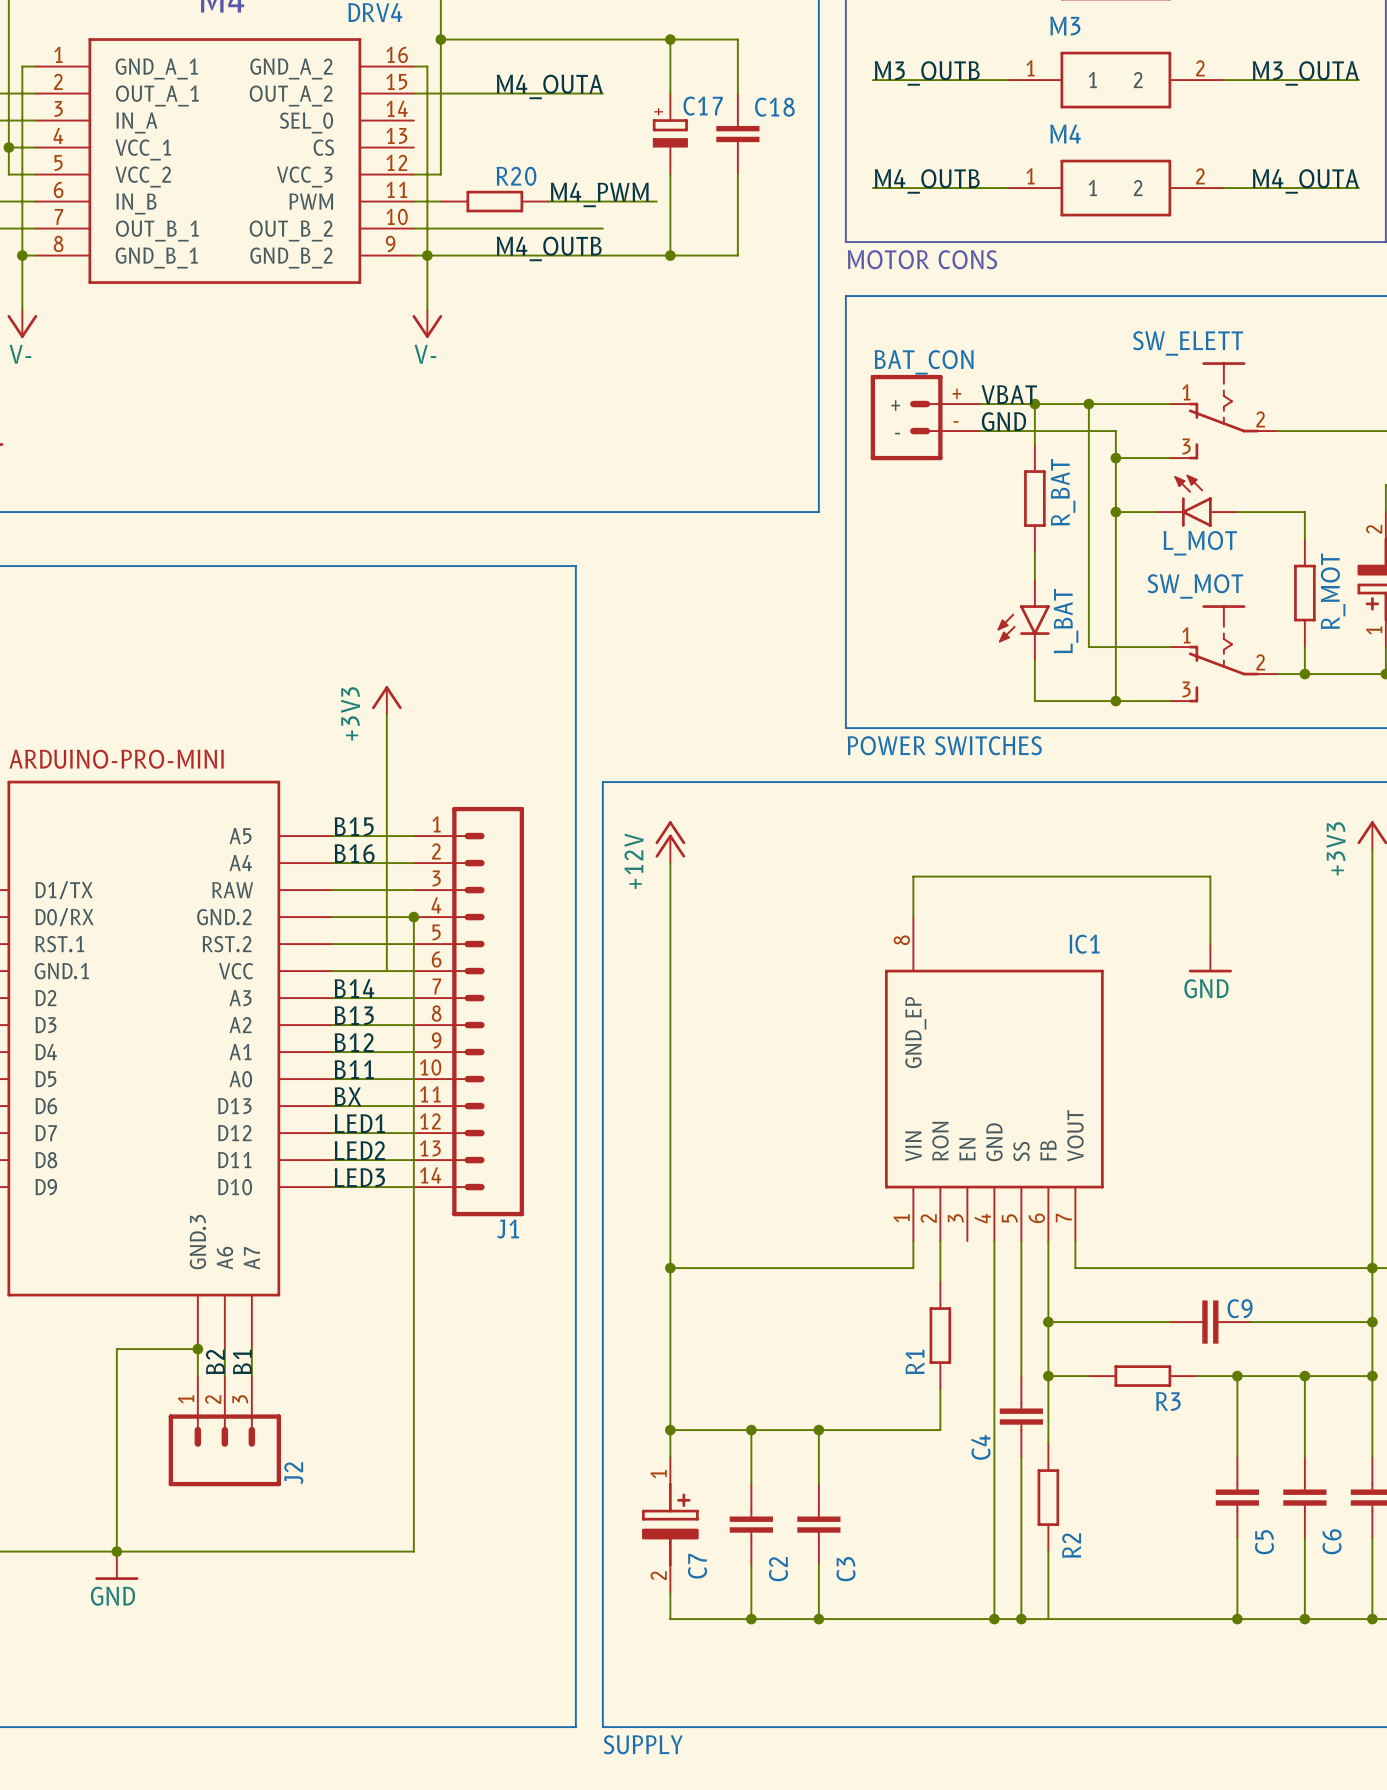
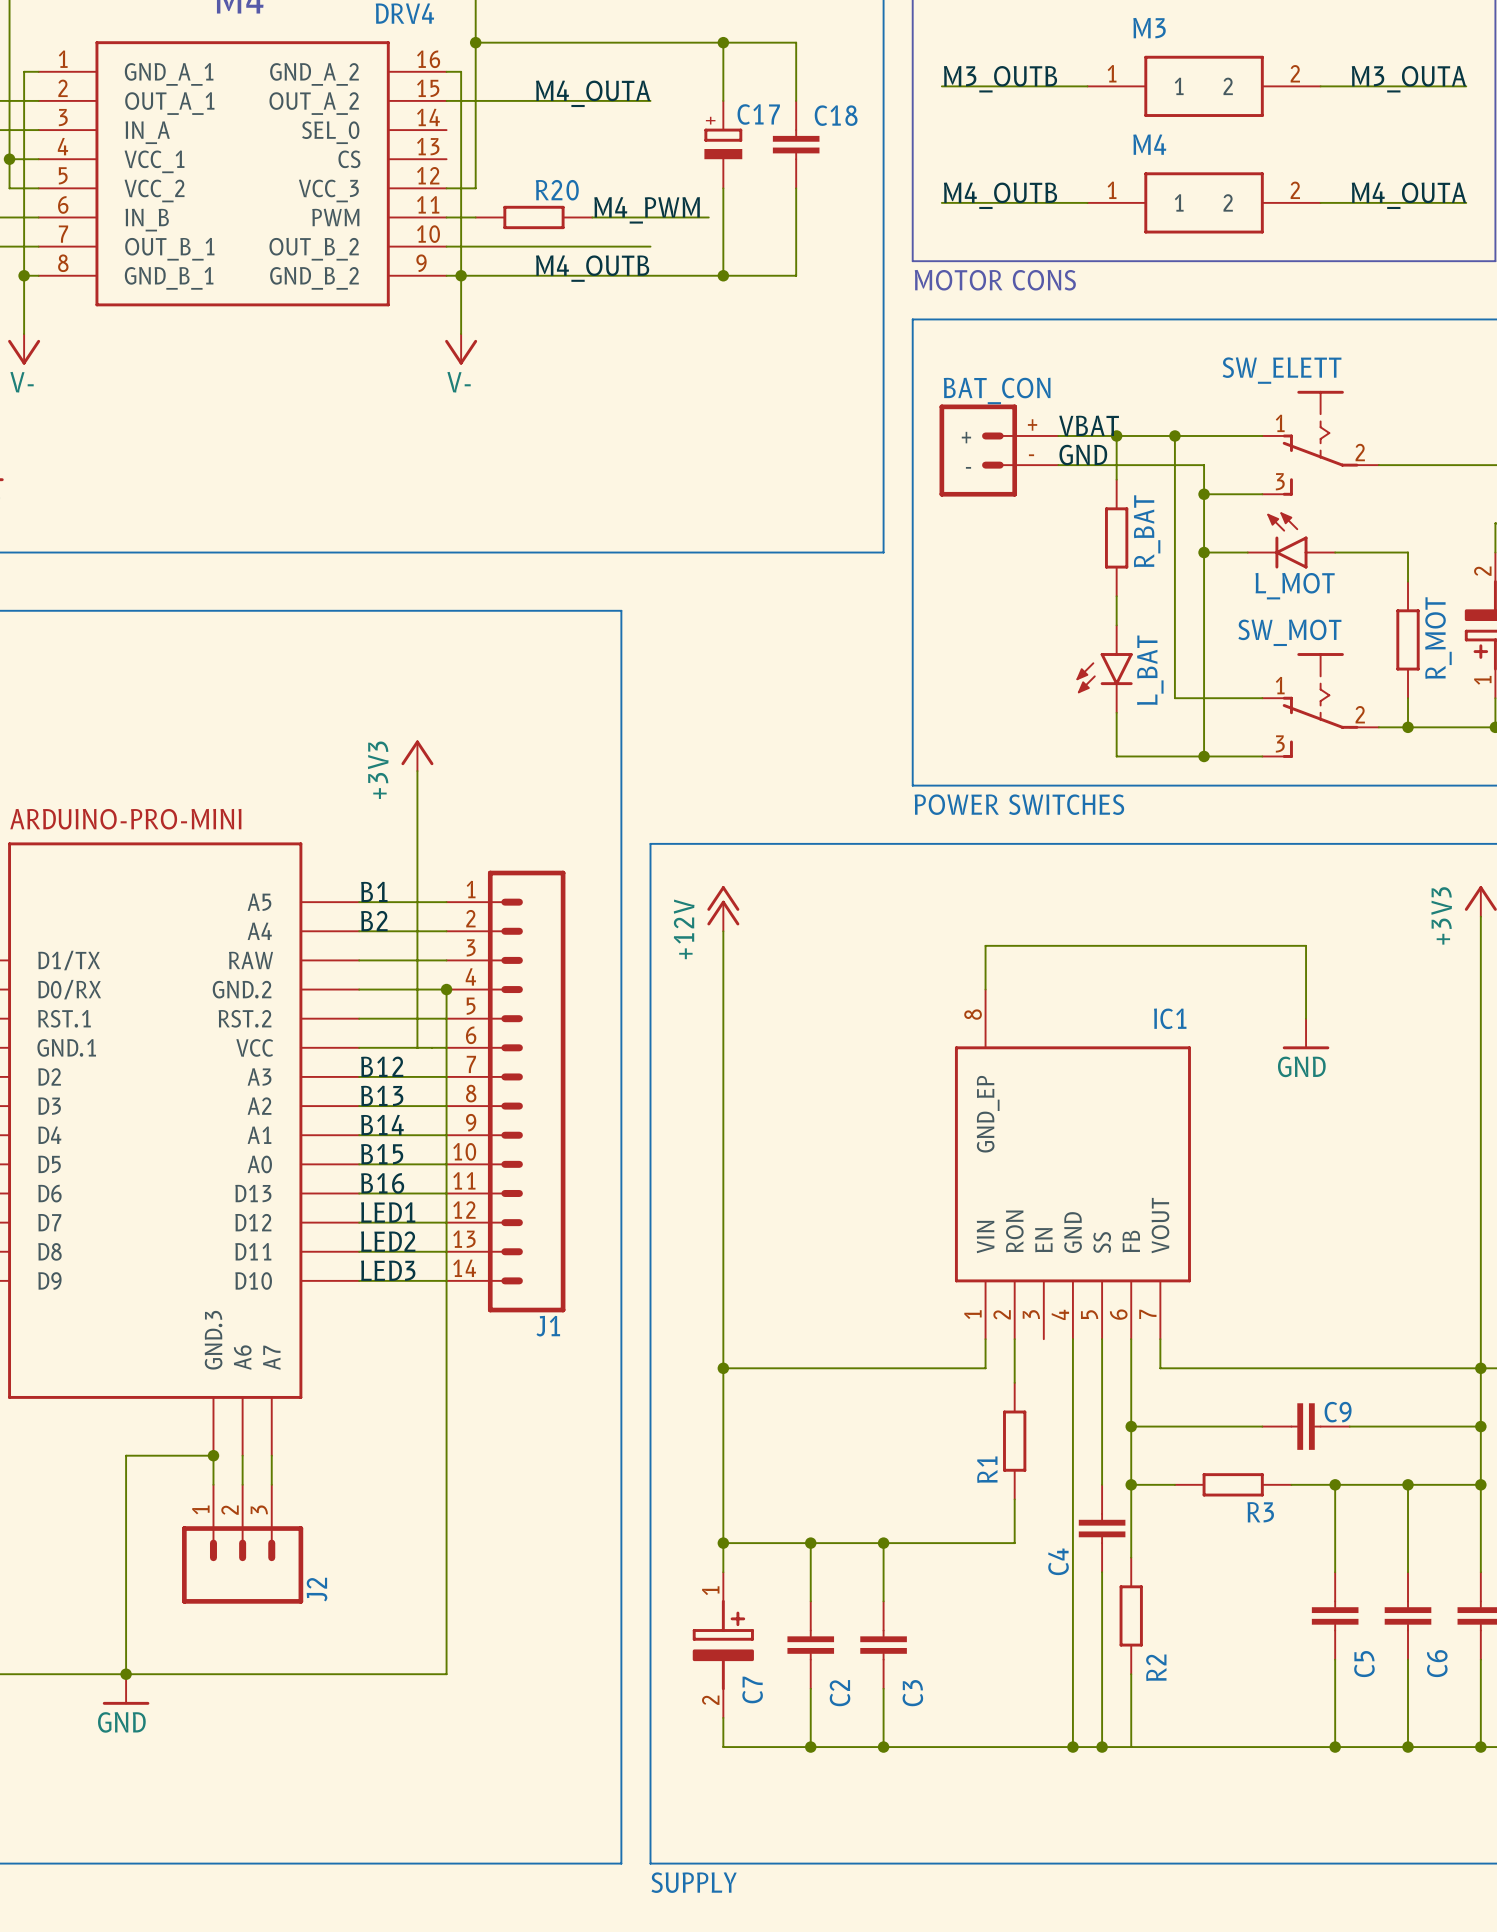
label: B15 (354, 826) -> B1 (374, 891)
label: B16 (354, 853) -> B2 (374, 921)
label: B14 (354, 988) -> B12 (382, 1066)
label: B12 (354, 1042) -> B14 (382, 1125)
label: B11 (354, 1069) -> B15 (382, 1154)
label: BX (347, 1096) -> B16 (382, 1183)
label: B2 (215, 1362) -> none
label: B1 (242, 1362) -> none

